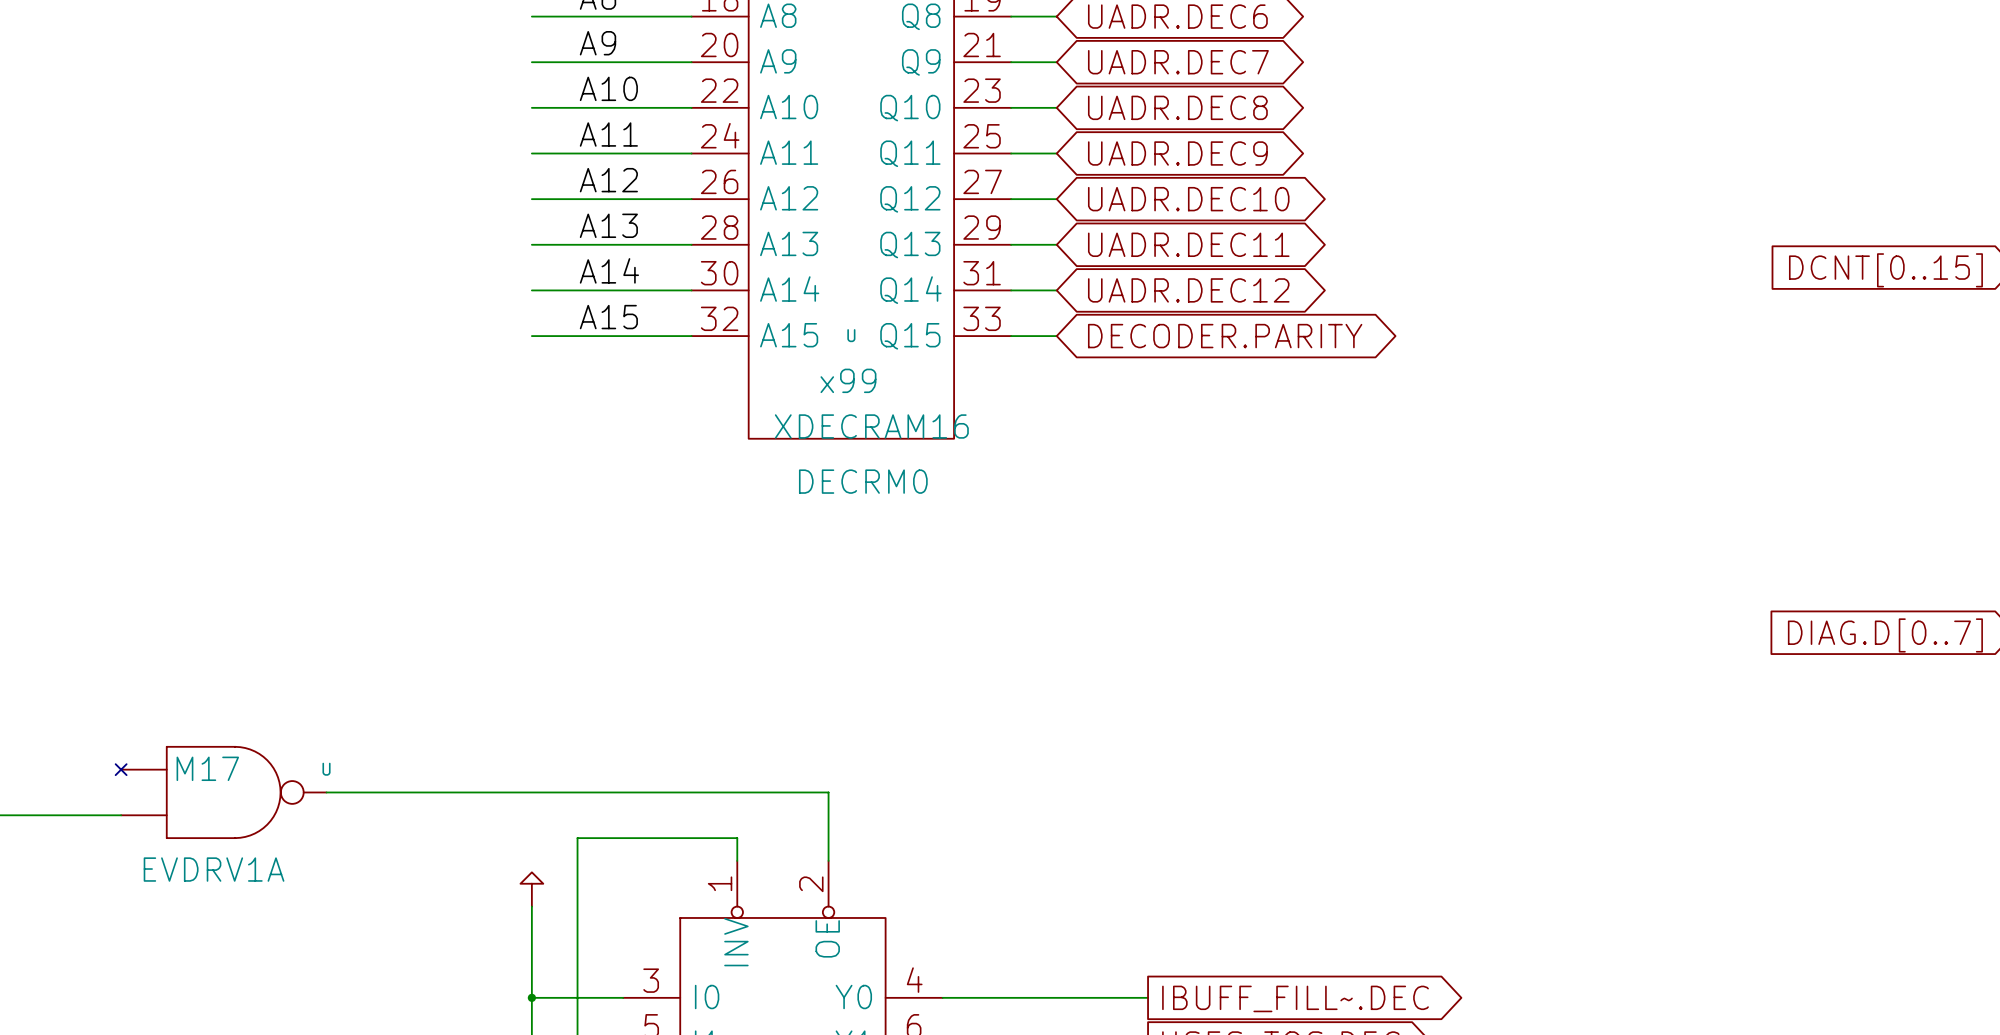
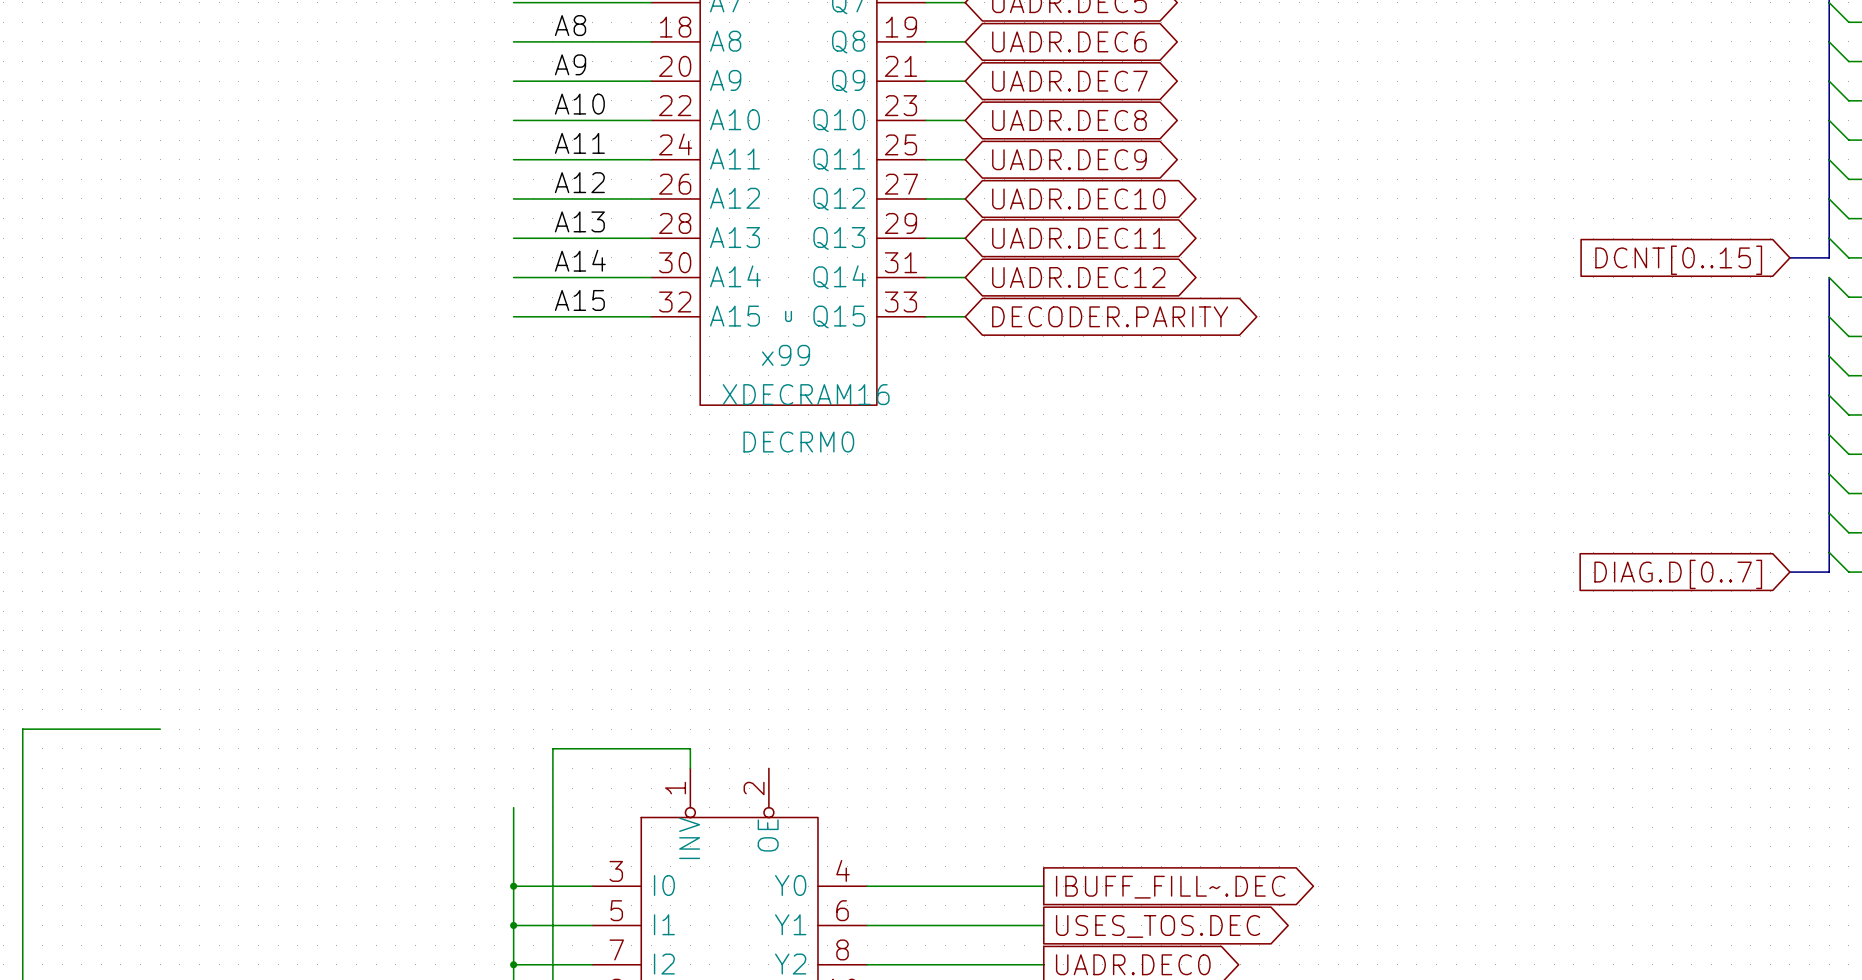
no-connect mark: (121, 769) -> none
U: (223, 792) -> none
wire: (326, 792) (828, 792) (828, 860) -> none
power symbol: (531, 889) -> none

